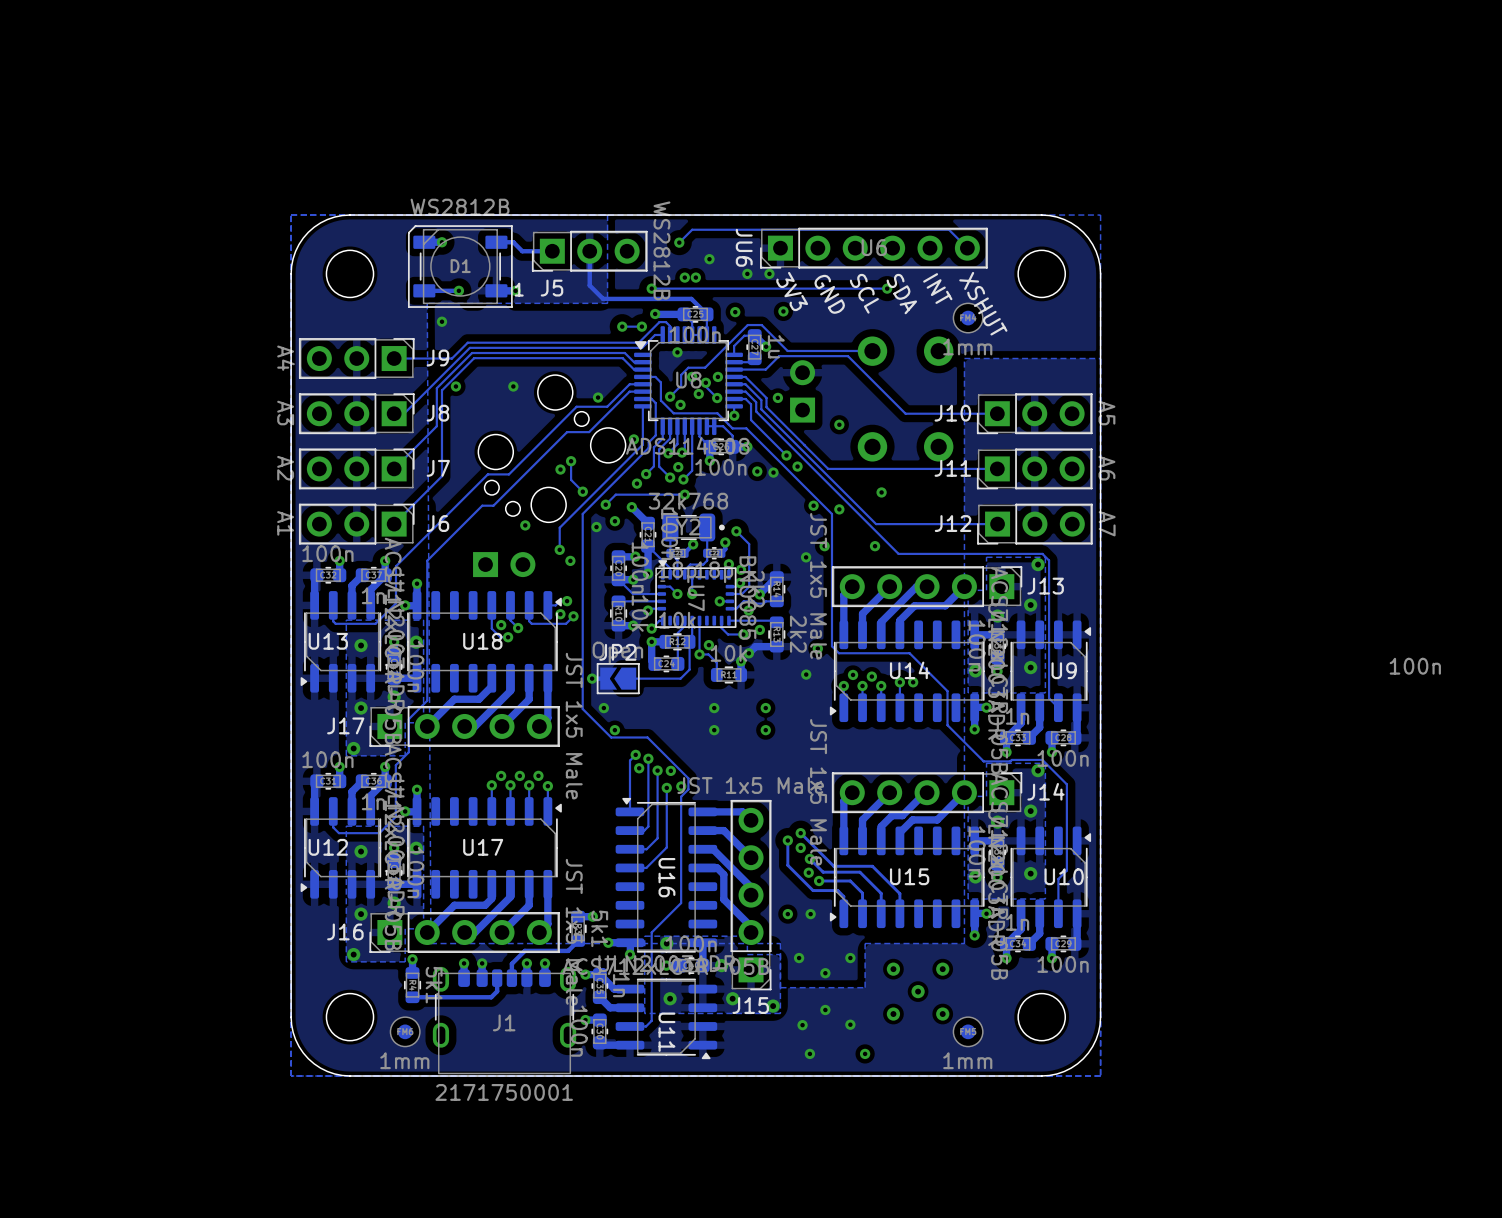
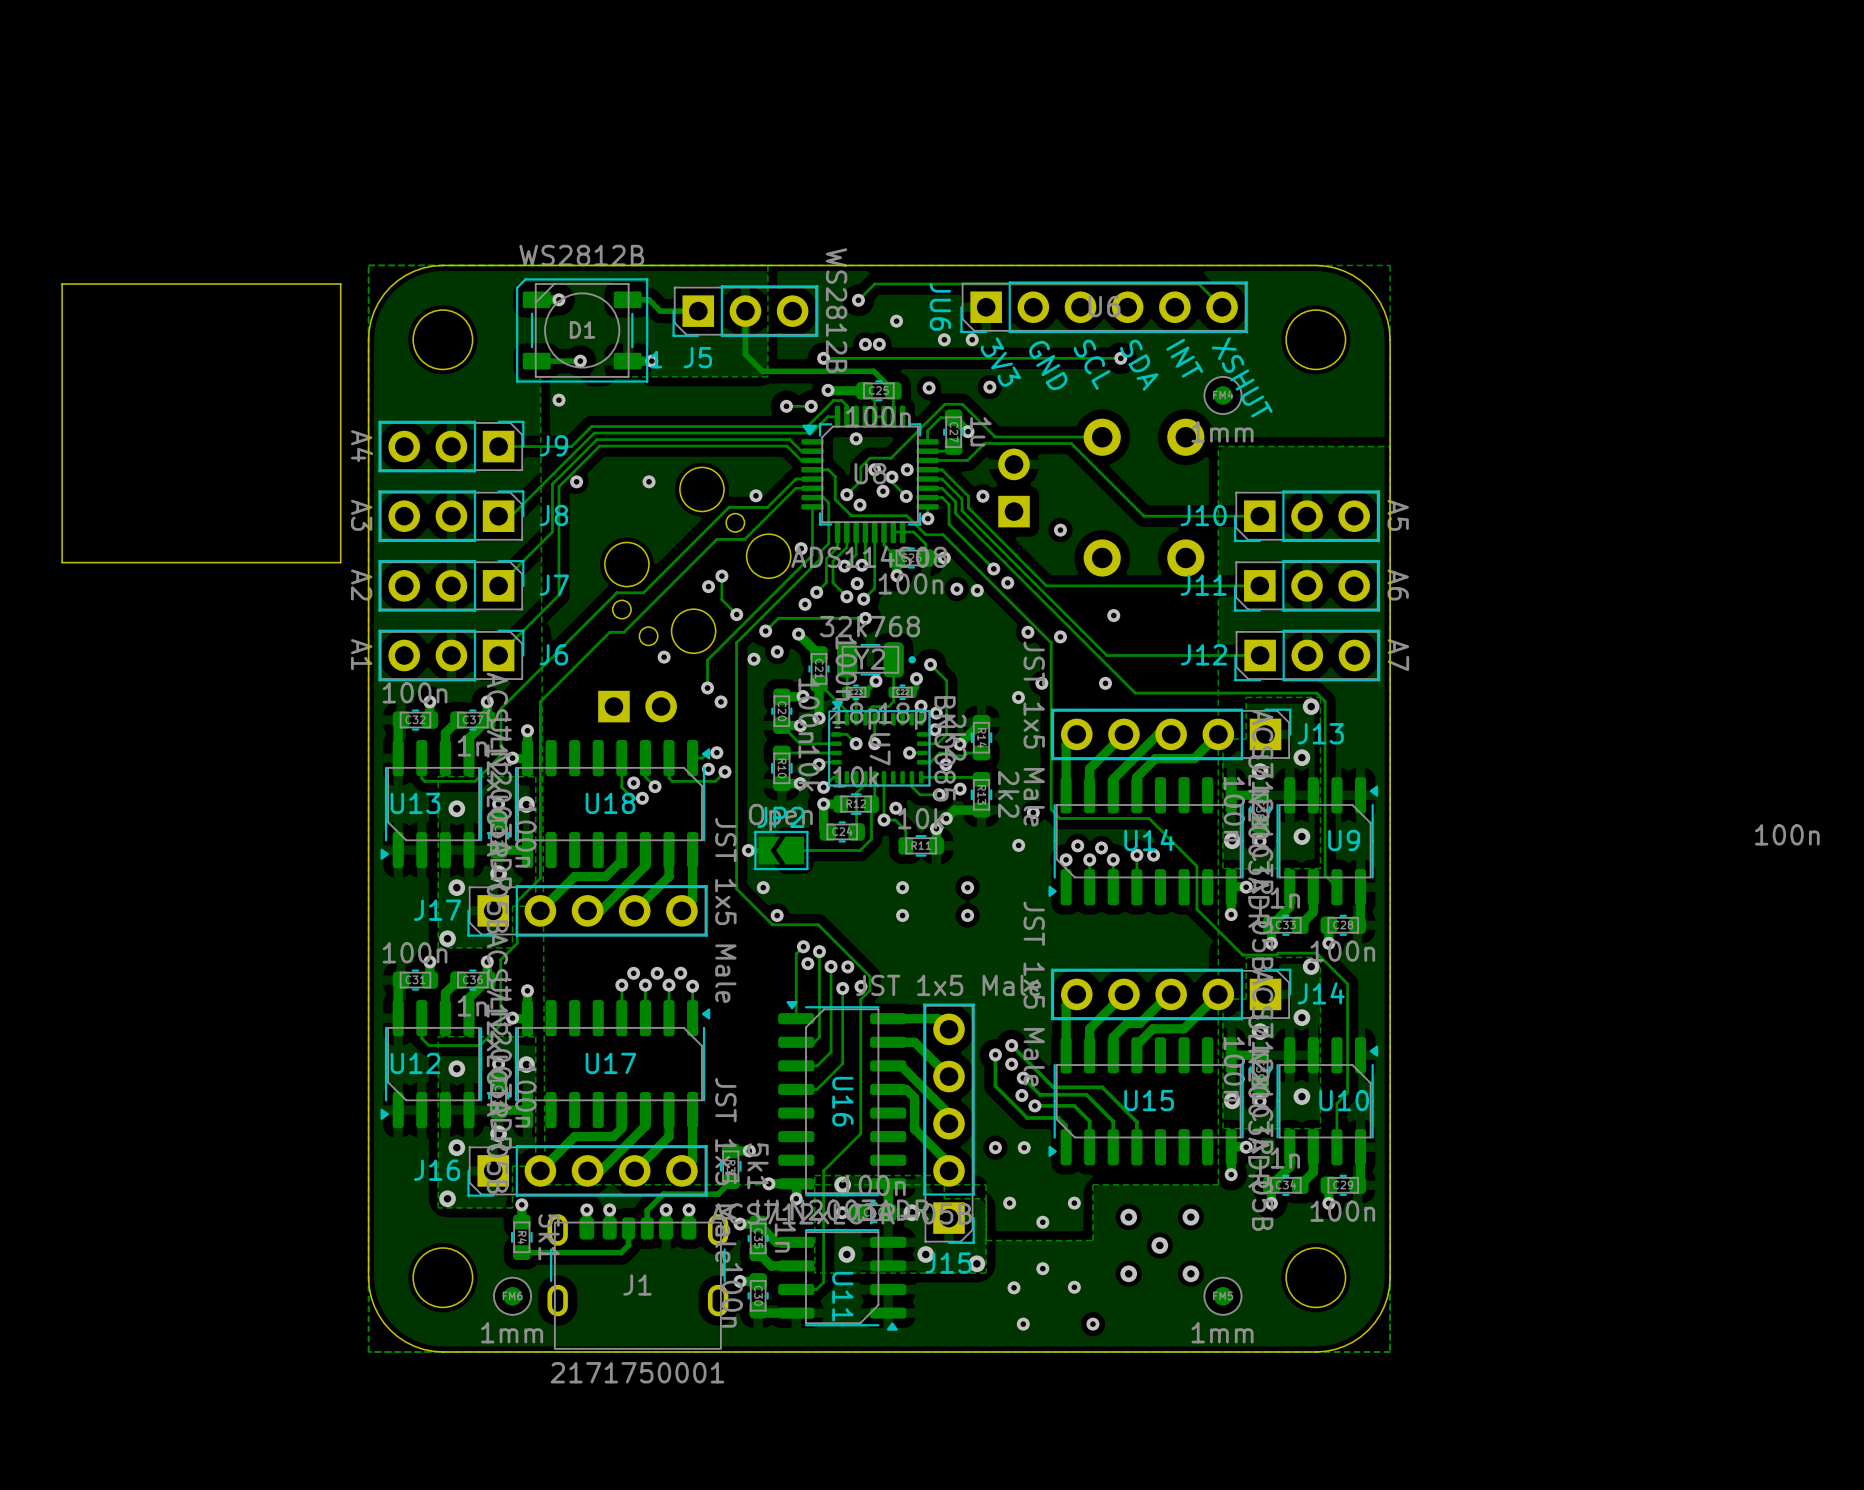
board edge: none -> (340, 284) (62, 284) (62, 562) (340, 562) (340, 284)

